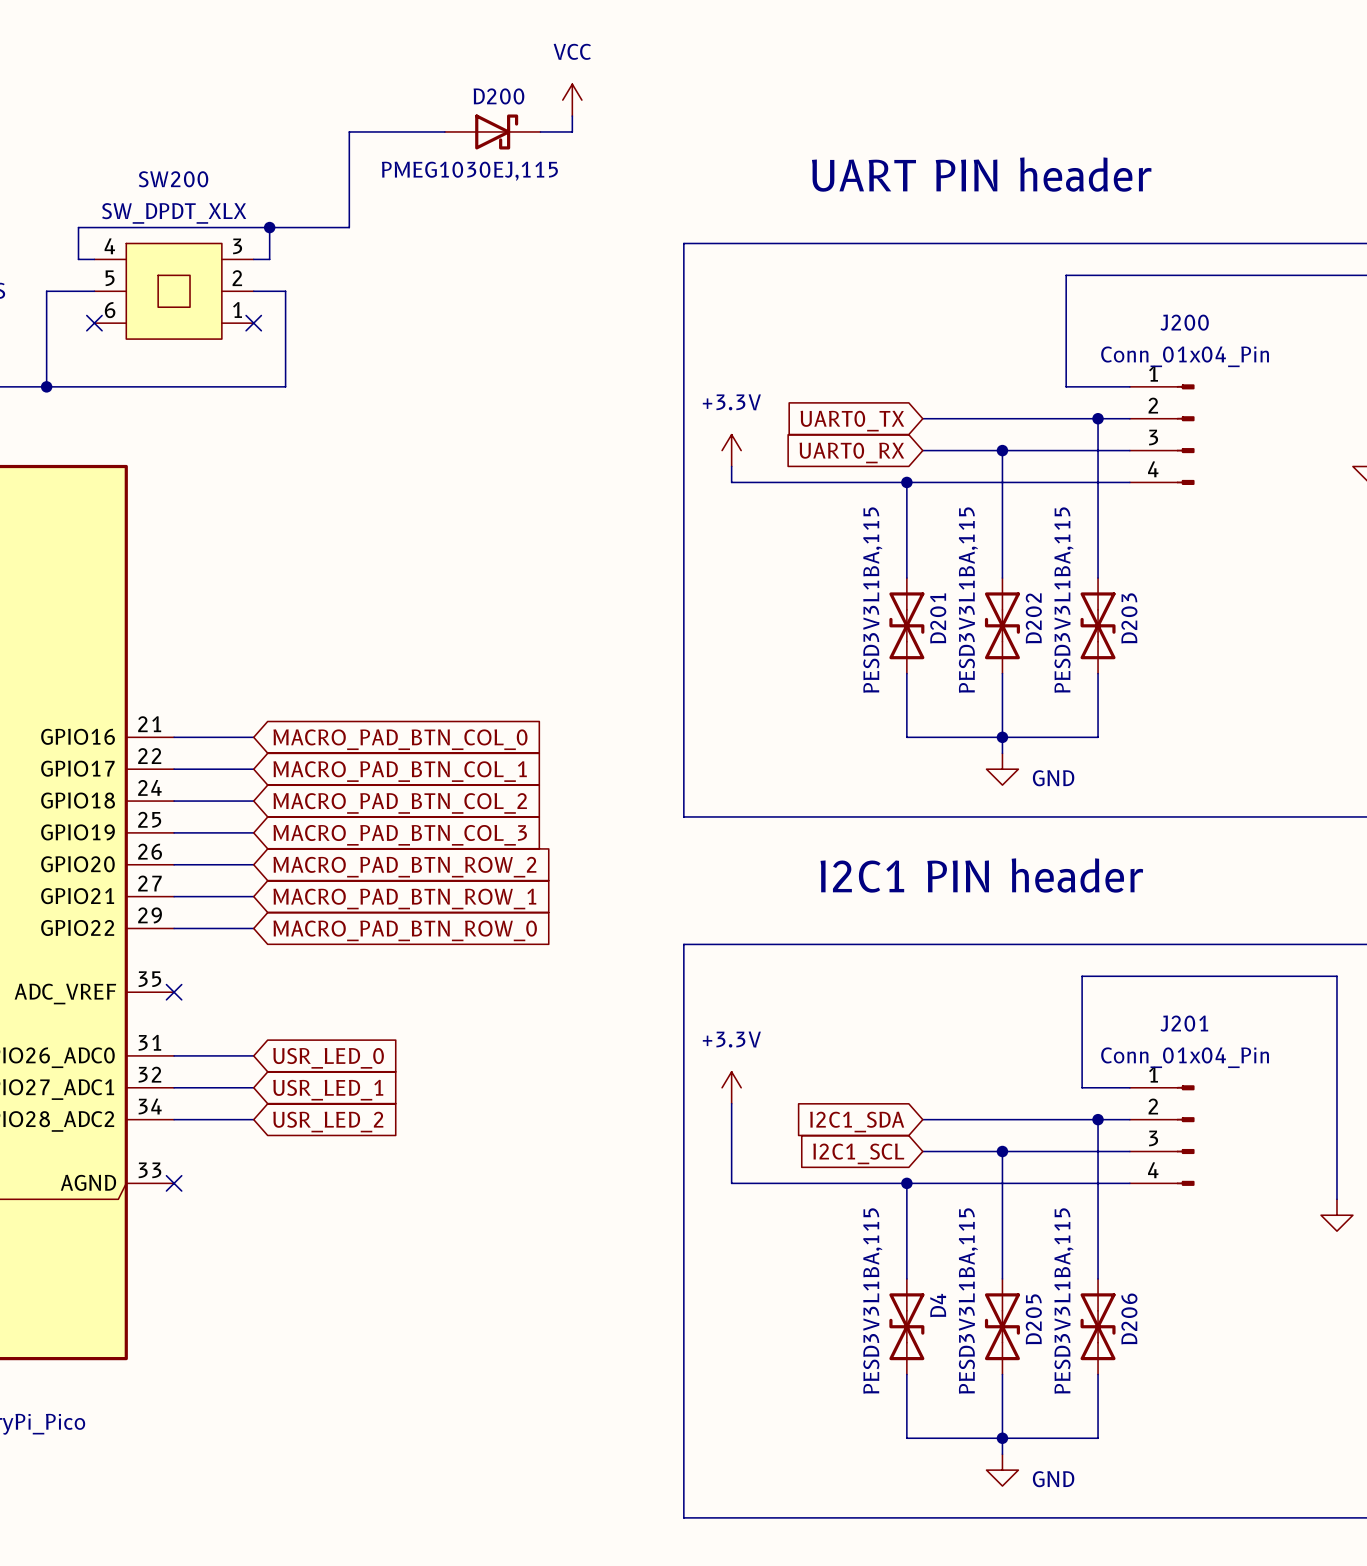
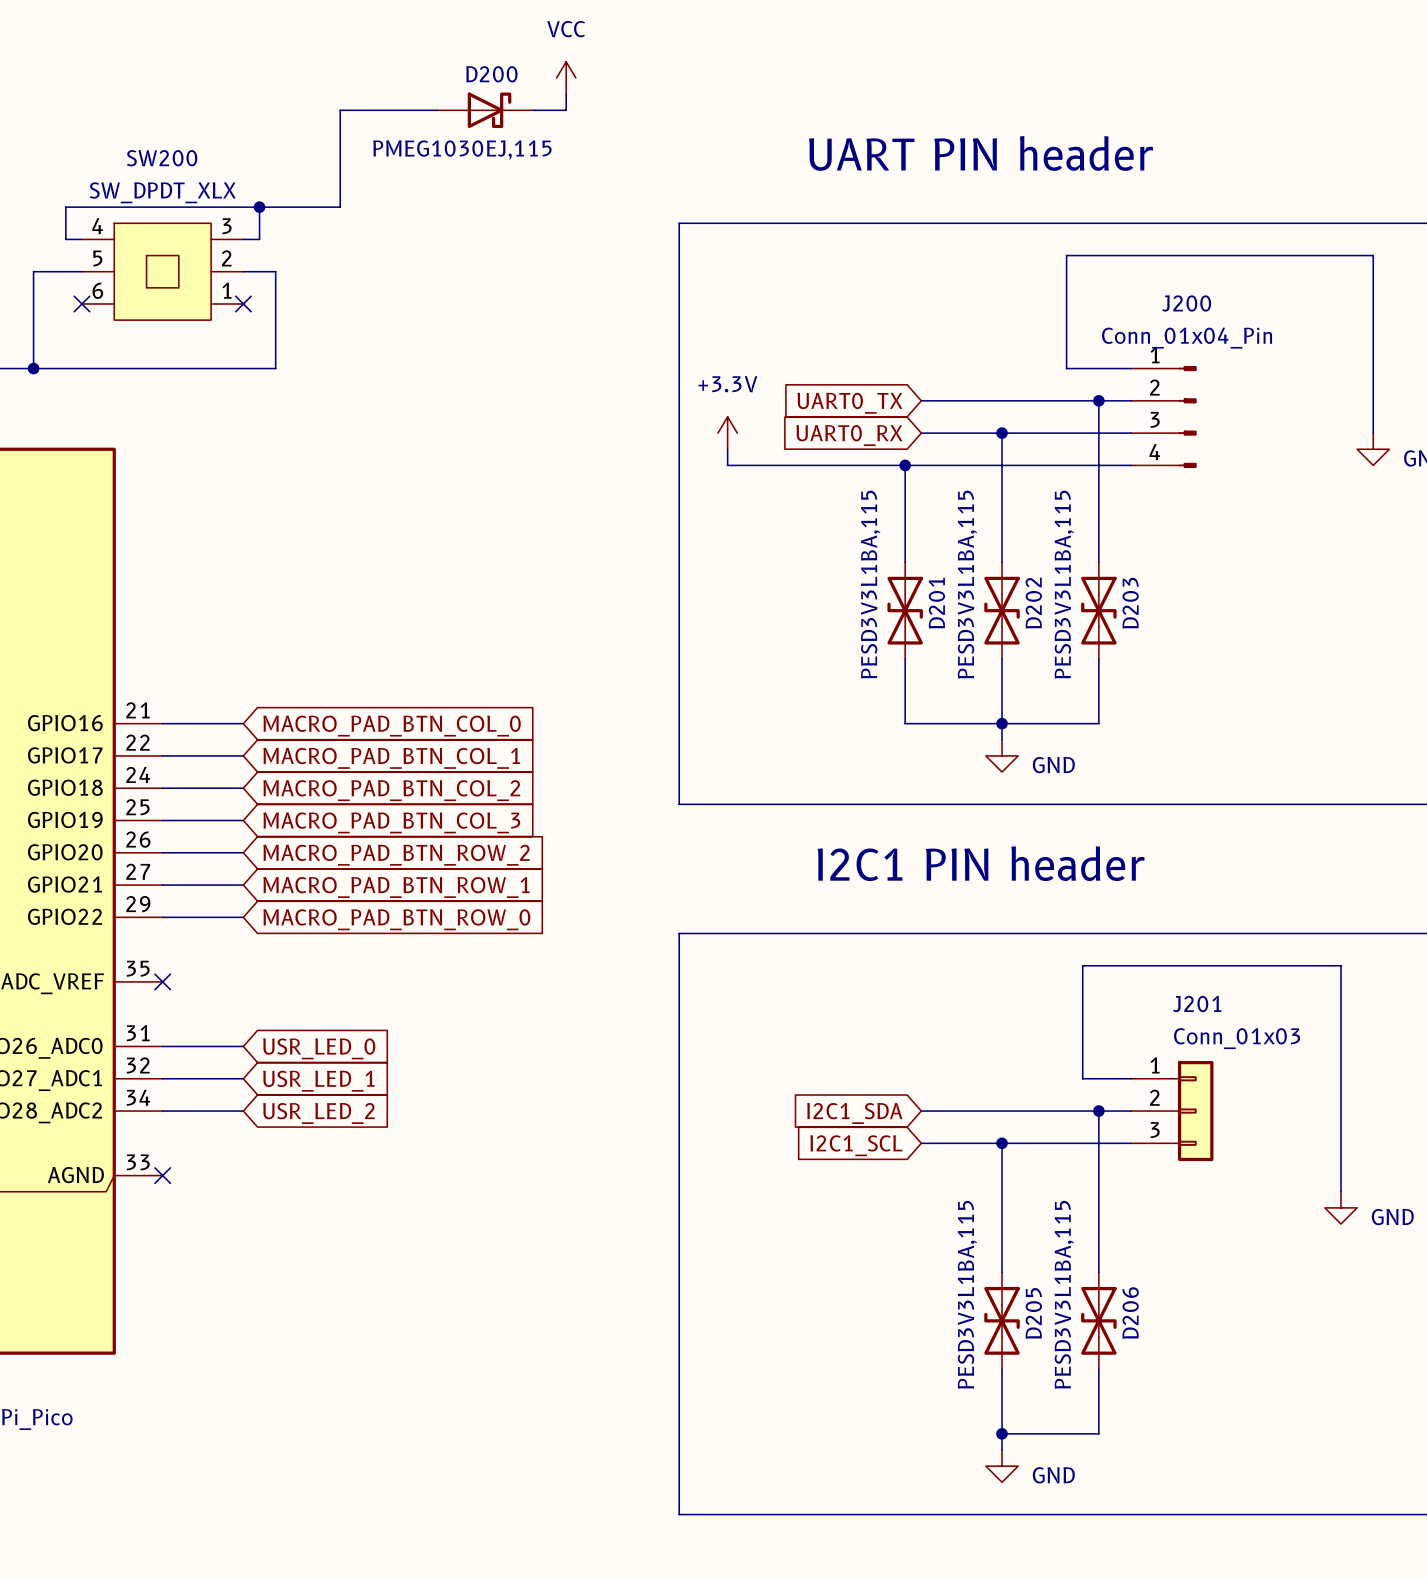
J201 value: Conn_01x04_Pin (1185, 1057) -> Conn_01x03 (1237, 1038)
J201 symbol: [1129, 1085, 1195, 1186] -> [1131, 1061, 1214, 1162]
power symbol: +3.3V (731, 1087) -> none
wire: (731, 1103) (731, 1183) (1129, 1183) -> none
wire: (906, 1183) (906, 1278) -> none
junction: (906, 1183) -> none
D4: PESD3V3L1BA,115 (906, 1326) -> none
wire: (906, 1374) (906, 1438) (1002, 1438) -> none

